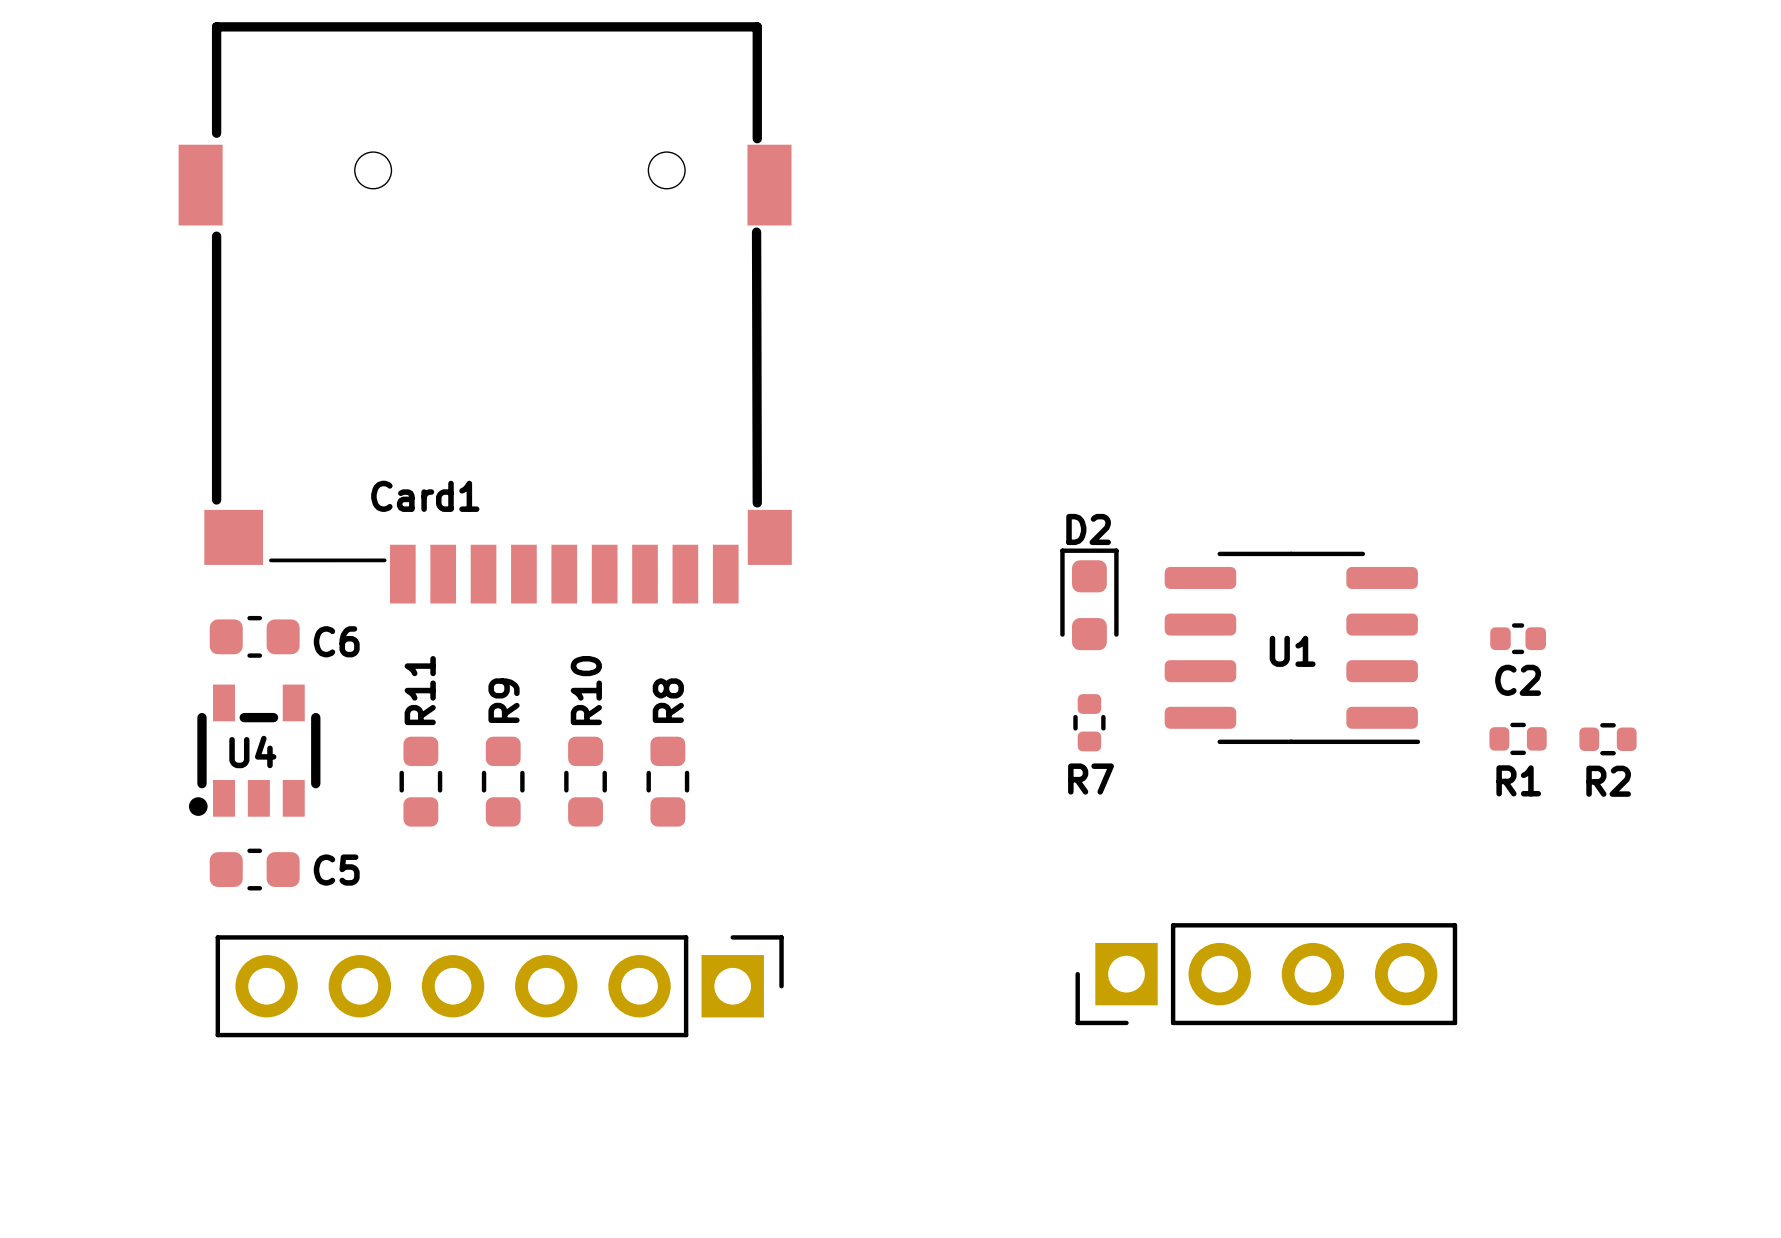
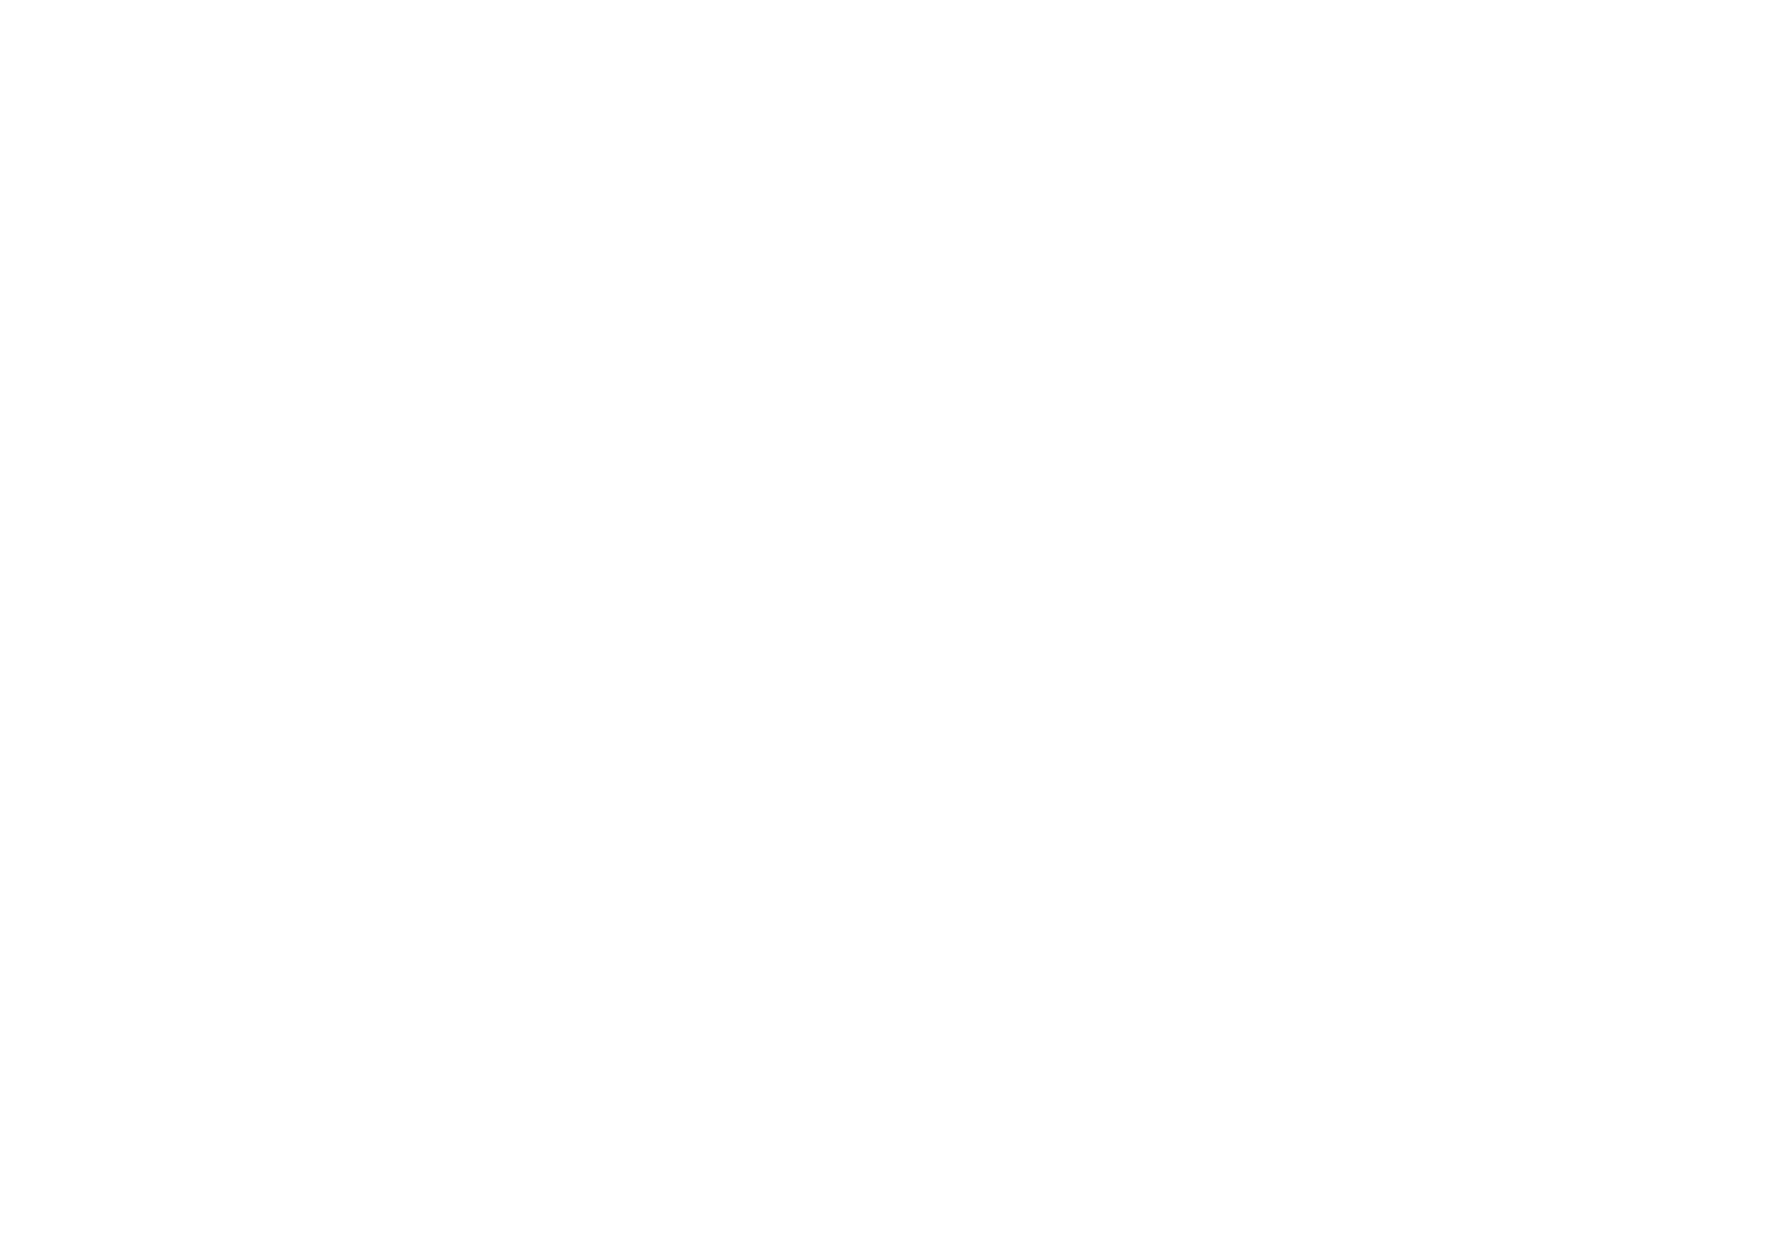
Card1: (485, 312) -> none
D2: (1089, 599) -> none
C6: (254, 636) -> none
C2: (1518, 638) -> none
U1: (1292, 647) -> none
R7: (1089, 722) -> none
R1: (1518, 738) -> none
R2: (1608, 739) -> none
U4: (254, 750) -> none
R11: (420, 781) -> none
R9: (503, 781) -> none
R10: (585, 781) -> none
R8: (667, 781) -> none
C5: (254, 869) -> none
part: (1266, 974) -> none
part: (499, 986) -> none

